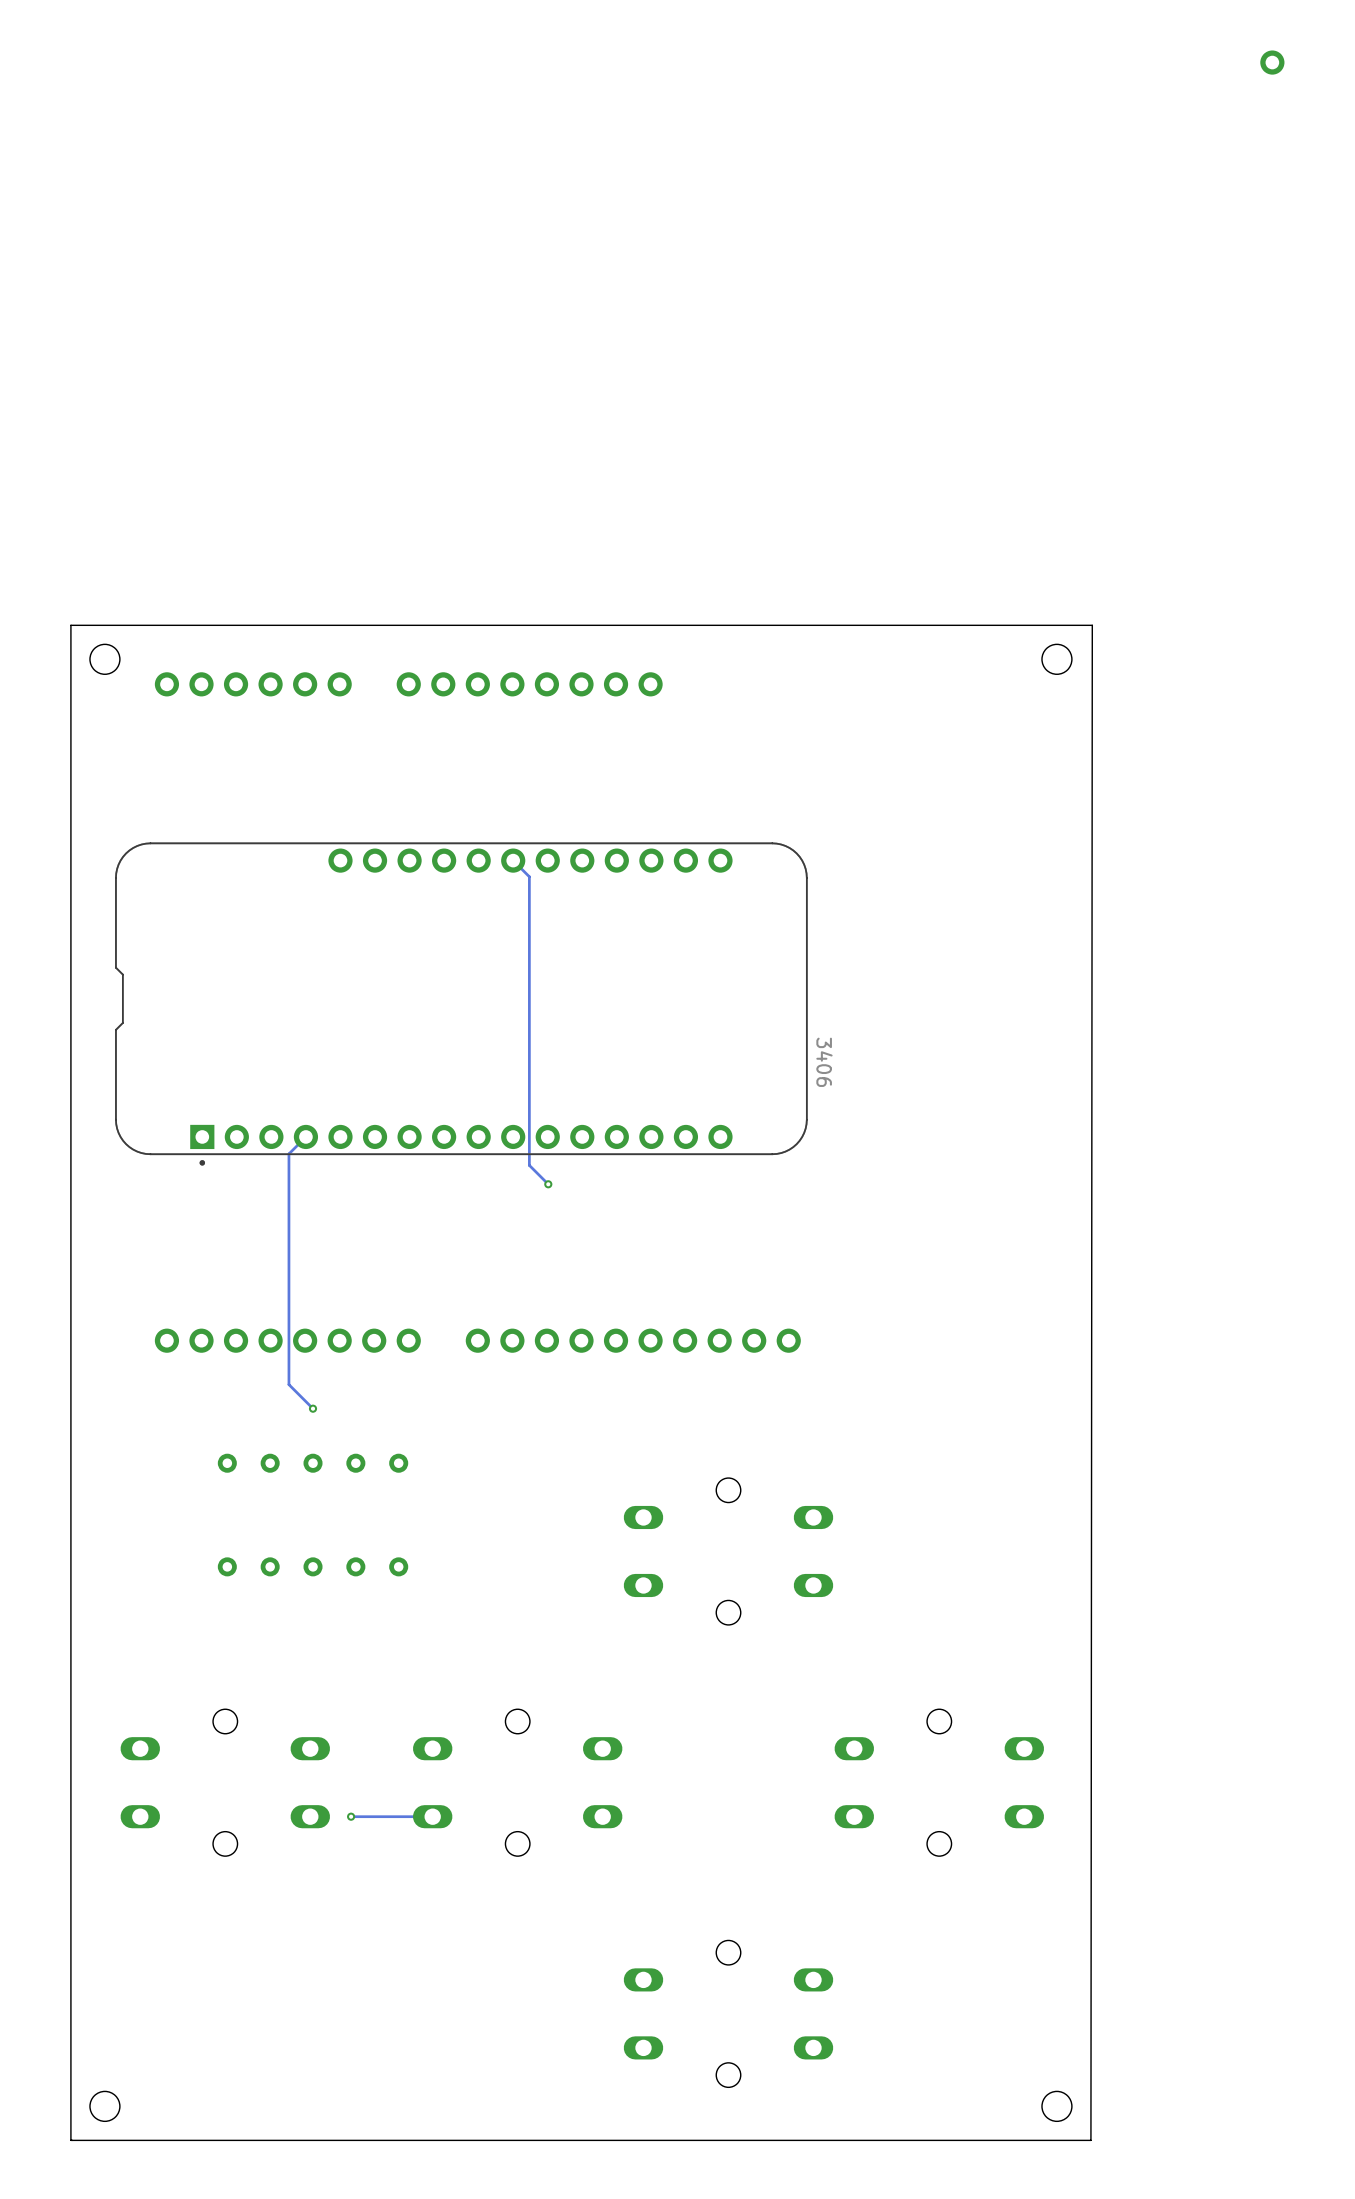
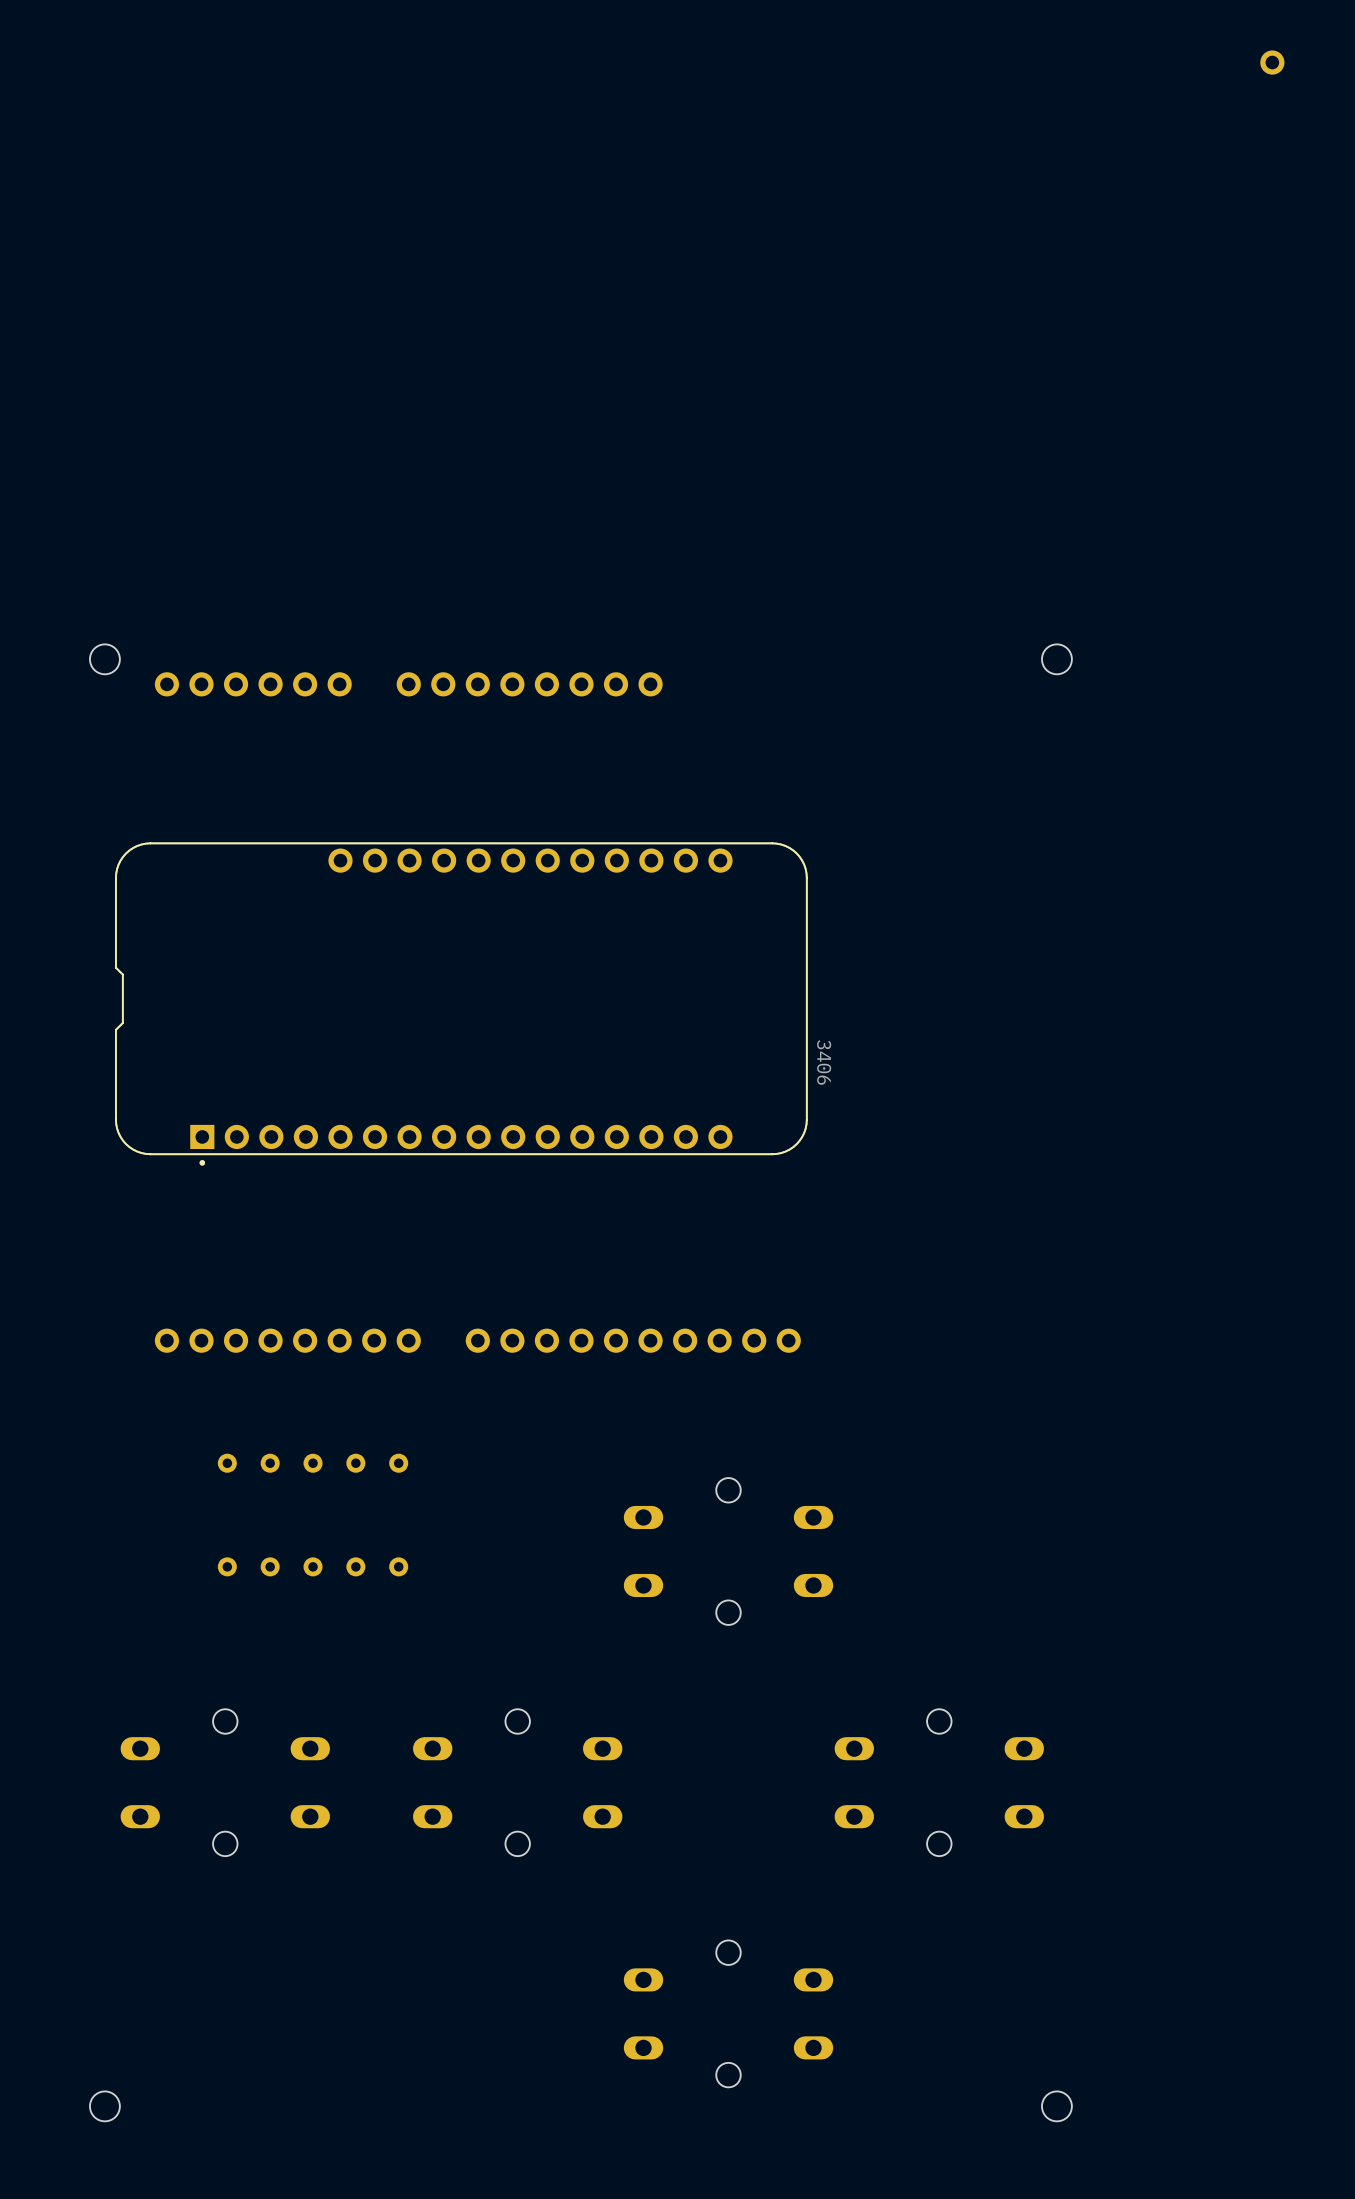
board edge: (1092, 625) (70, 625) (70, 2140) (1090, 2140) (1092, 625) -> none
track: (513, 860) (529, 876) (529, 1165) (548, 1184) -> none
track: (305, 1136) (288, 1153) (288, 1384) (313, 1408) -> none
via: (548, 1184) -> none
via: (313, 1408) -> none
via: (351, 1816) -> none
track: (432, 1816) (351, 1816) -> none

